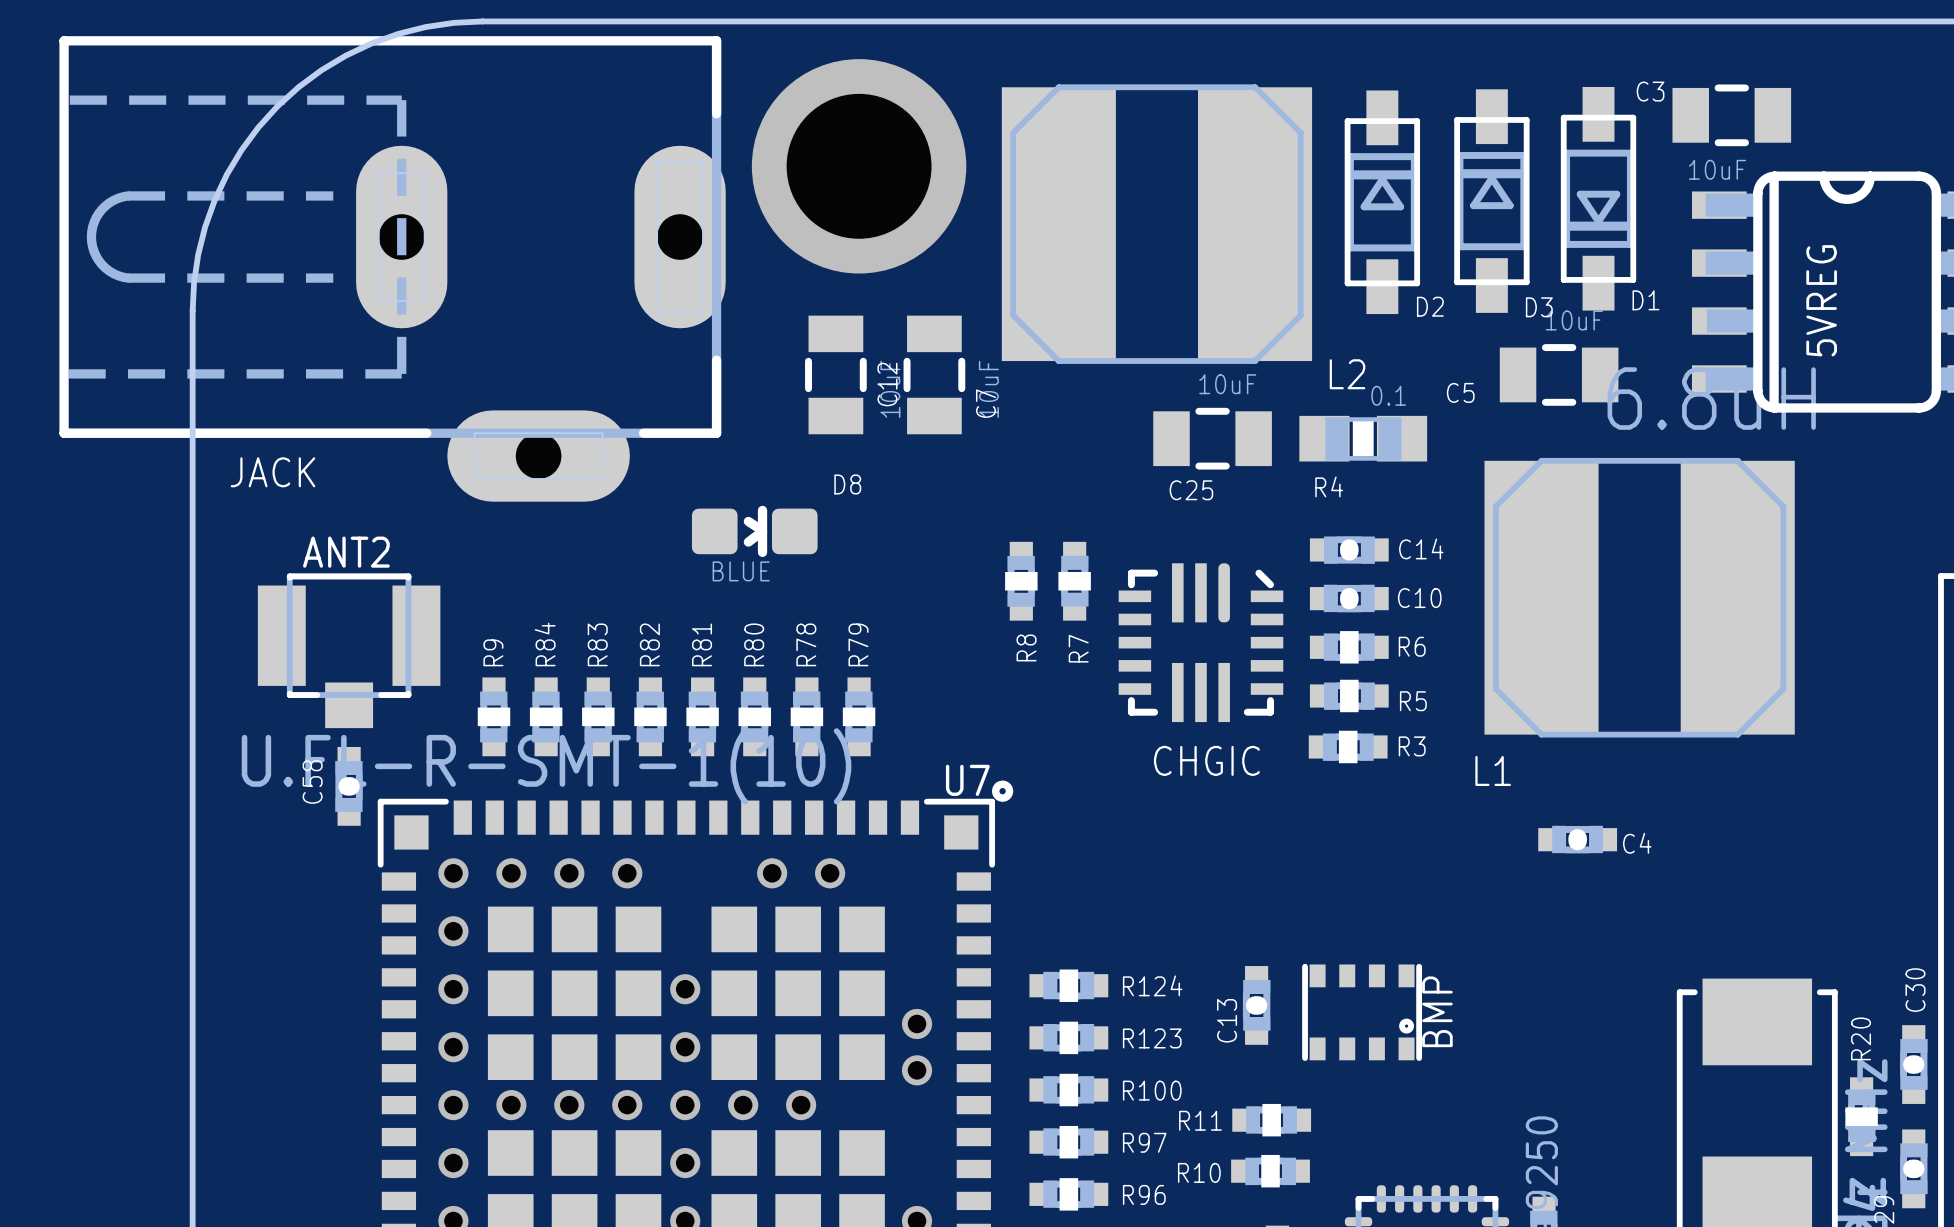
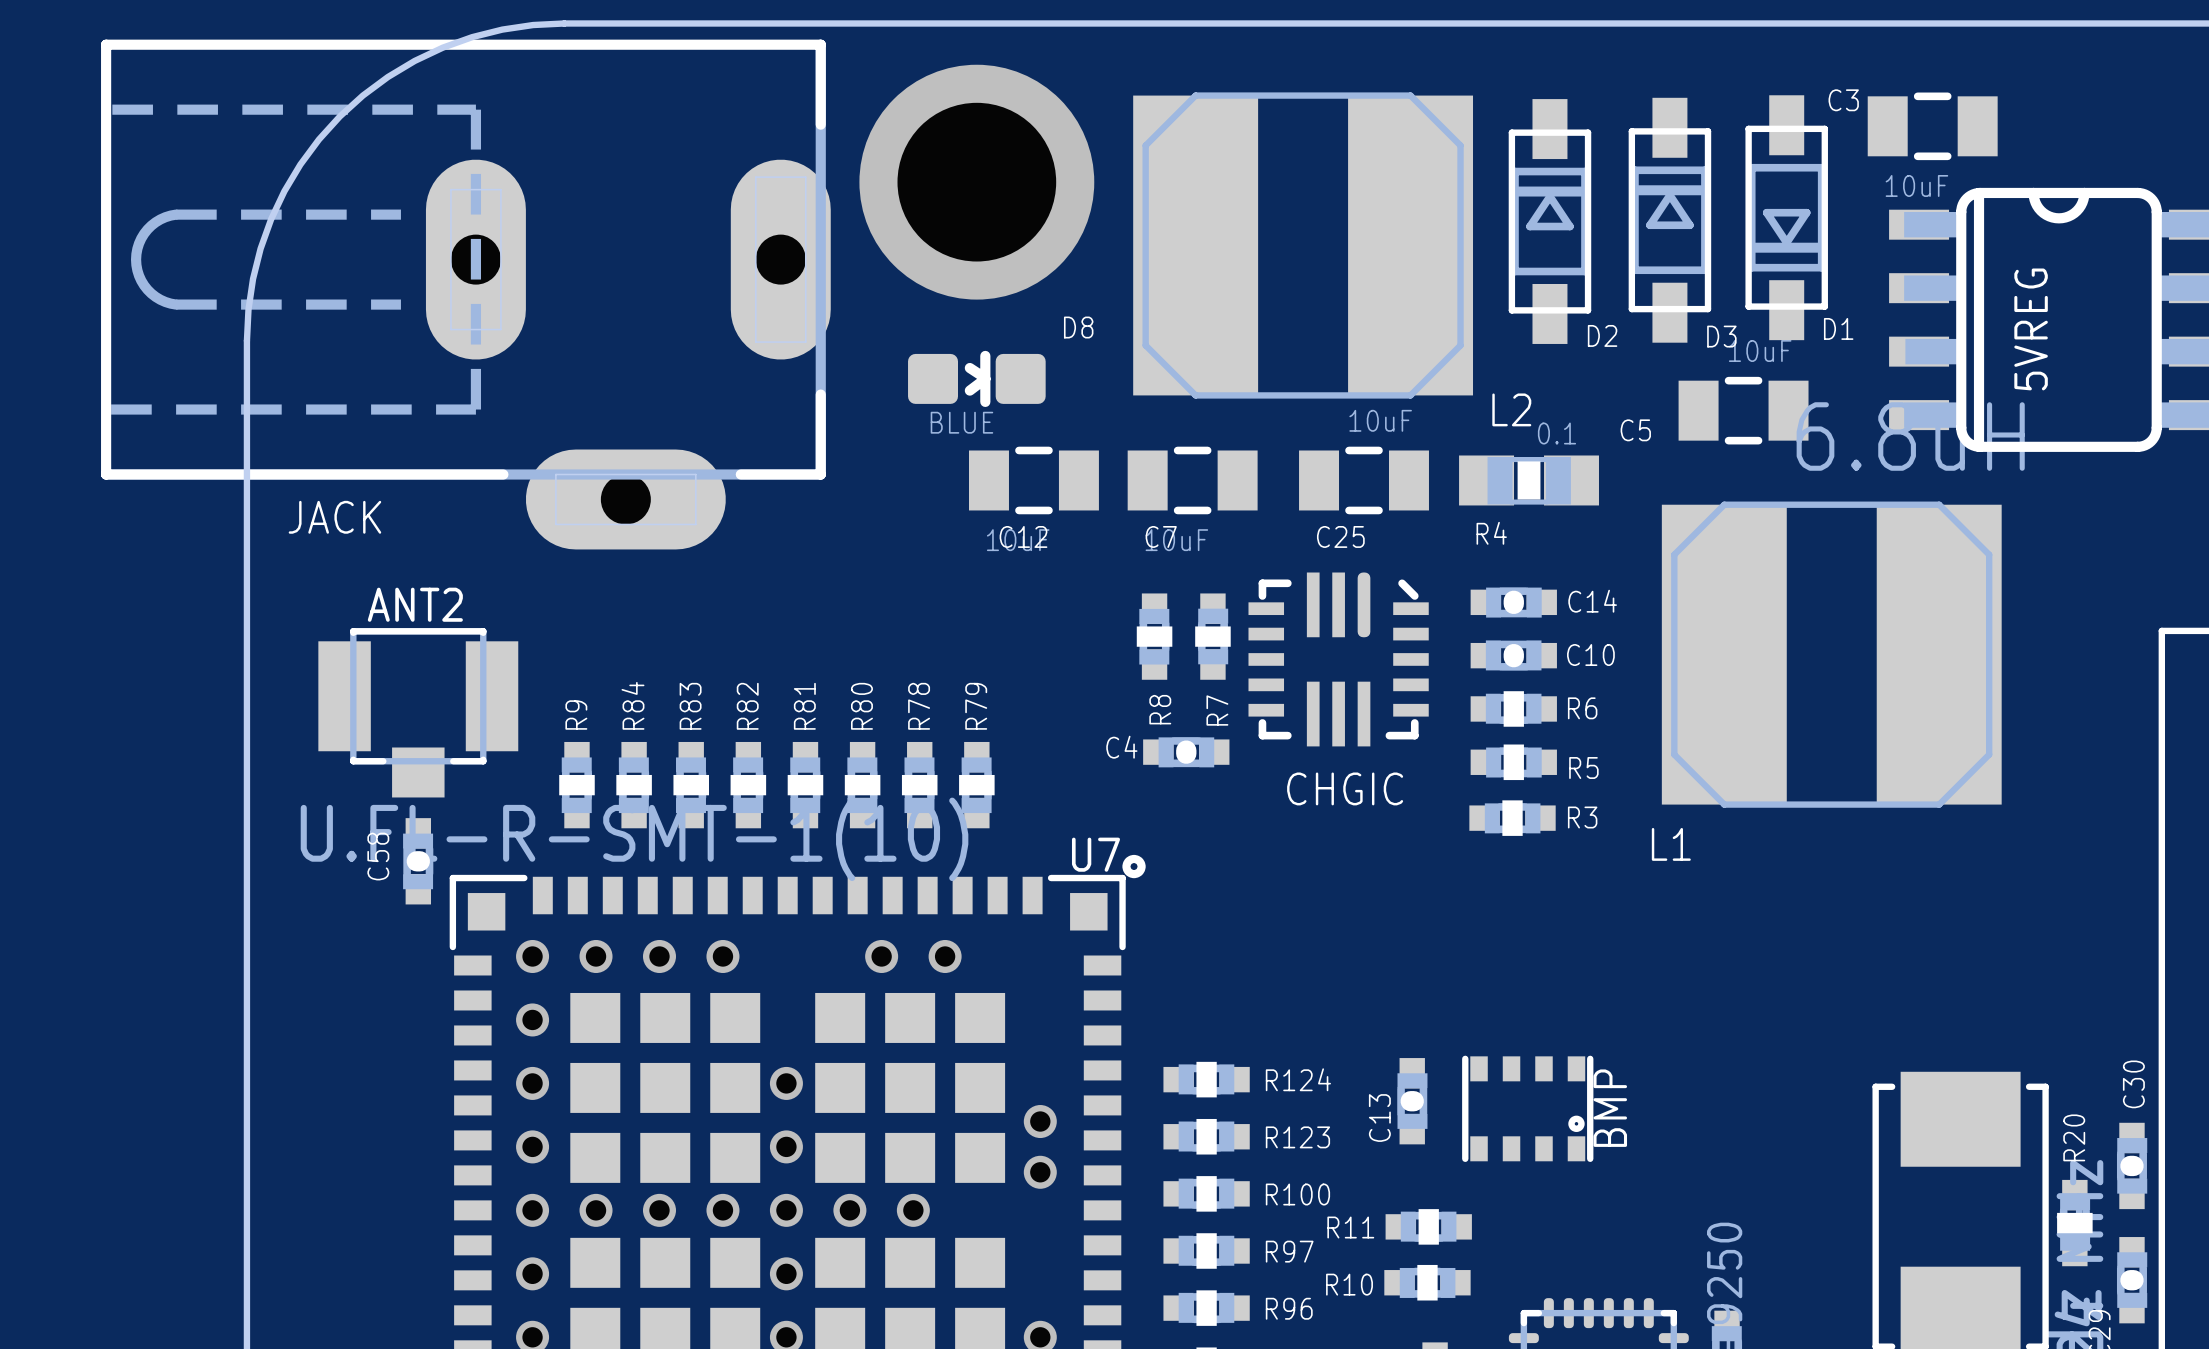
C12 rotation: 0° (835, 374) -> 90° clockwise (1033, 480)
C12 position: (835, 374) -> (1033, 480)
C7 rotation: 0° (934, 374) -> 90° clockwise (1192, 480)
C7 position: (934, 374) -> (1192, 480)
D8 position: (754, 531) -> (976, 378)
CHGIC position: (1200, 642) -> (1338, 659)
C4 position: (1577, 839) -> (1186, 752)
C4 name position: C4 (1637, 843) -> C4 (1121, 747)

